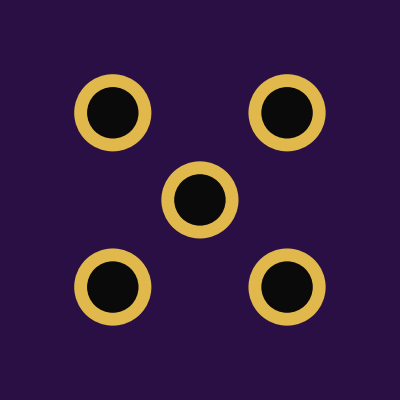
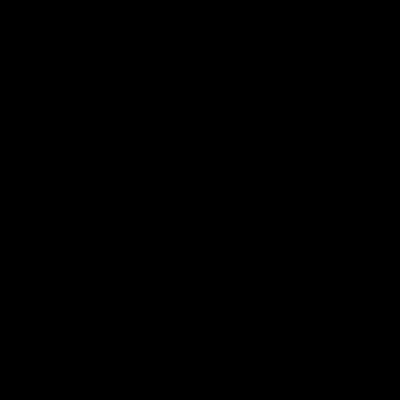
part: (199, 199) -> none

